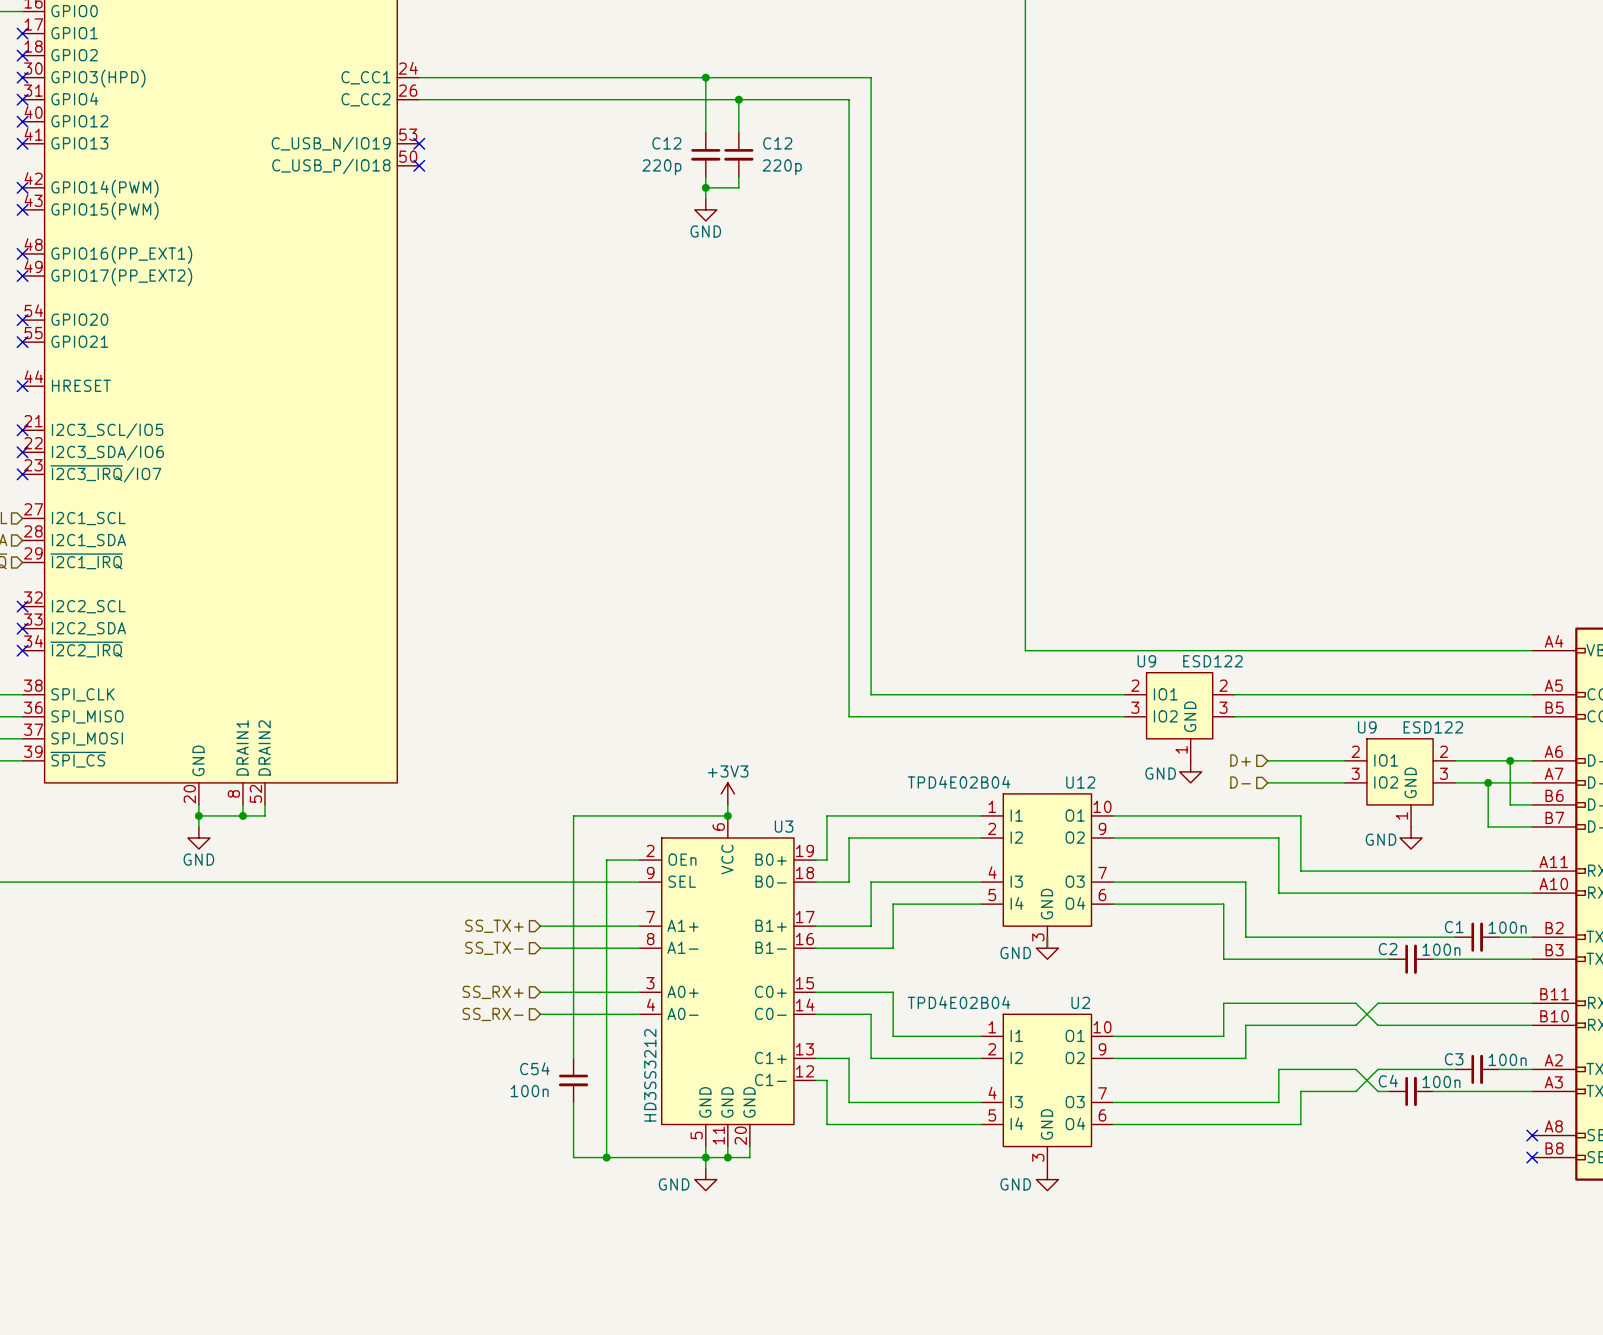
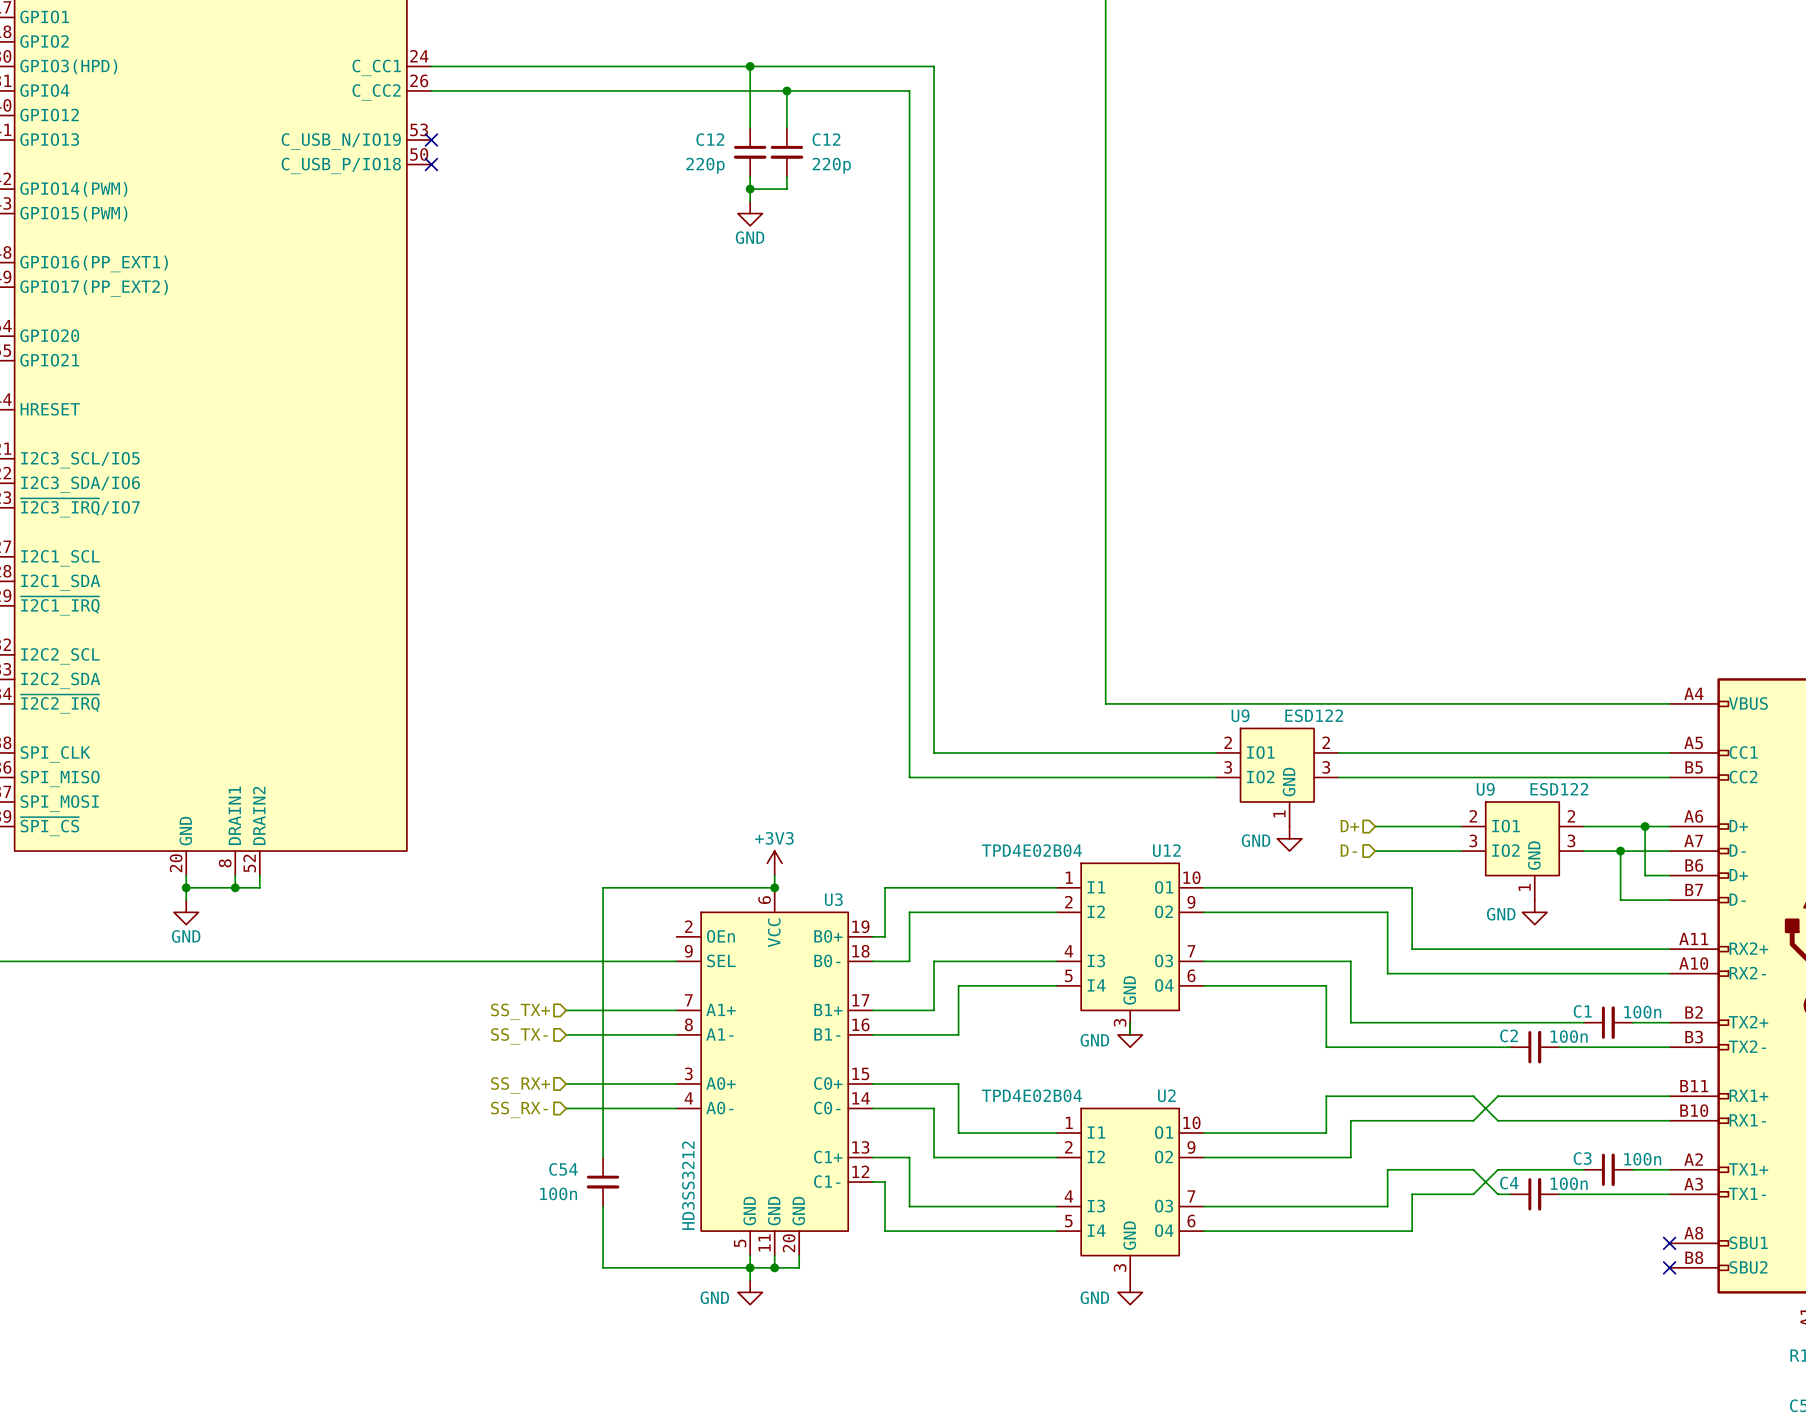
wire: (639, 860) (606, 860) (606, 1157) -> none
junction: (606, 1157) -> none

